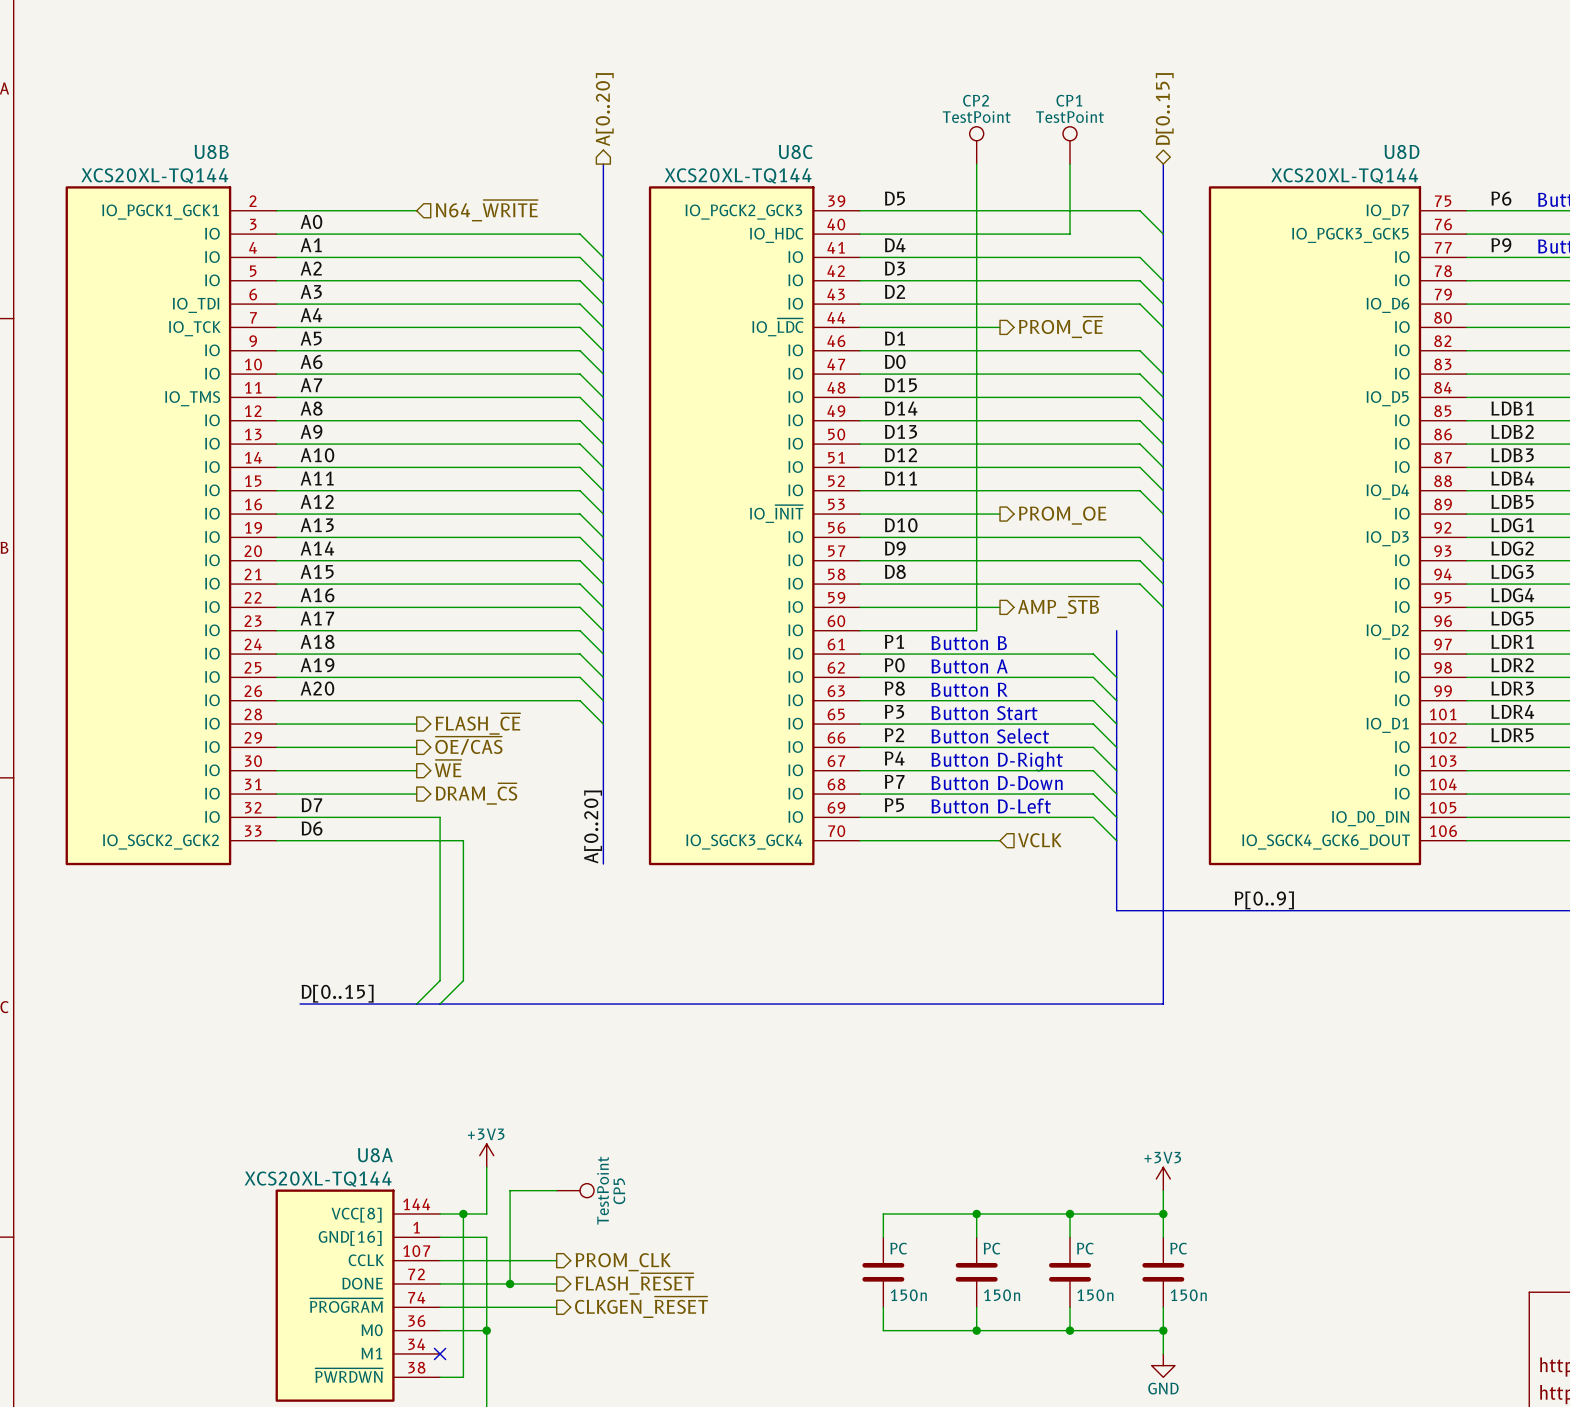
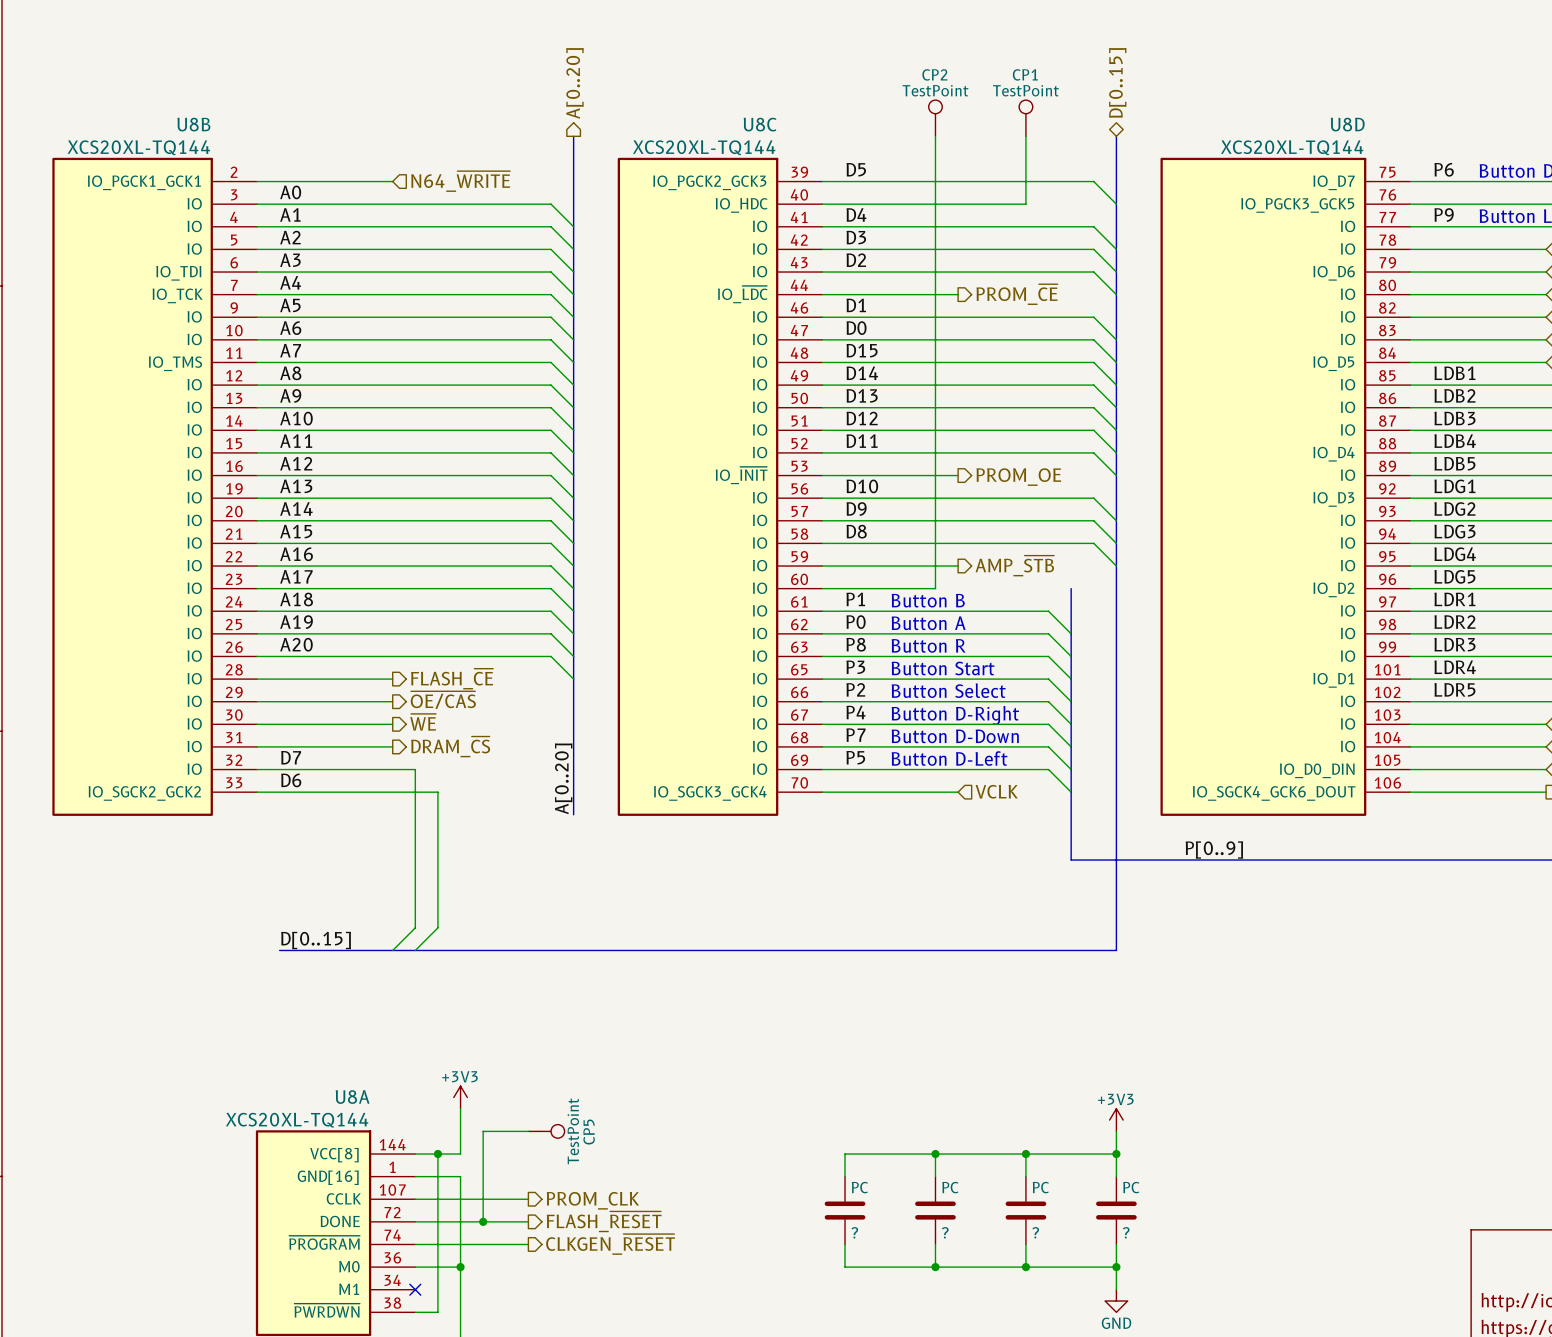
PC value: 150n (908, 1295) -> ? (854, 1232)
PC value: 150n (1002, 1295) -> ? (945, 1232)
PC value: 150n (1095, 1295) -> ? (1035, 1232)
PC value: 150n (1188, 1295) -> ? (1126, 1232)

